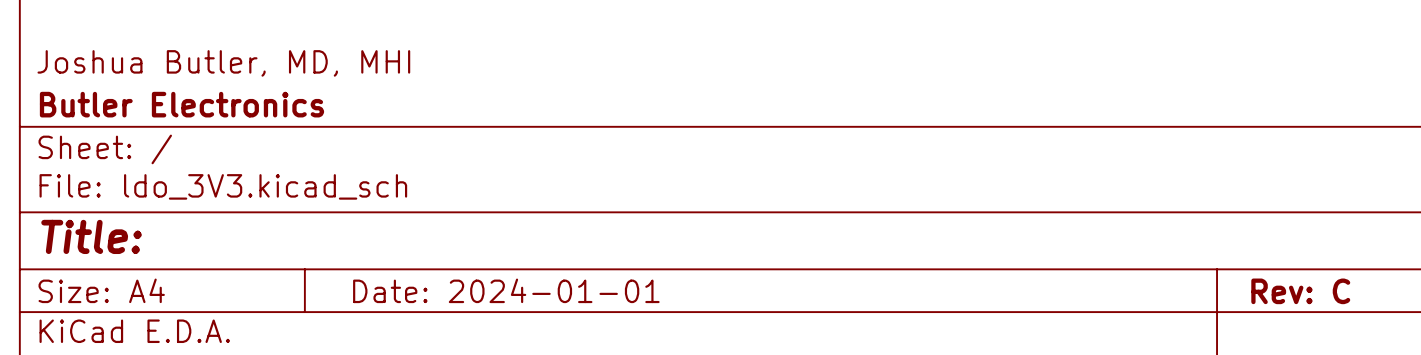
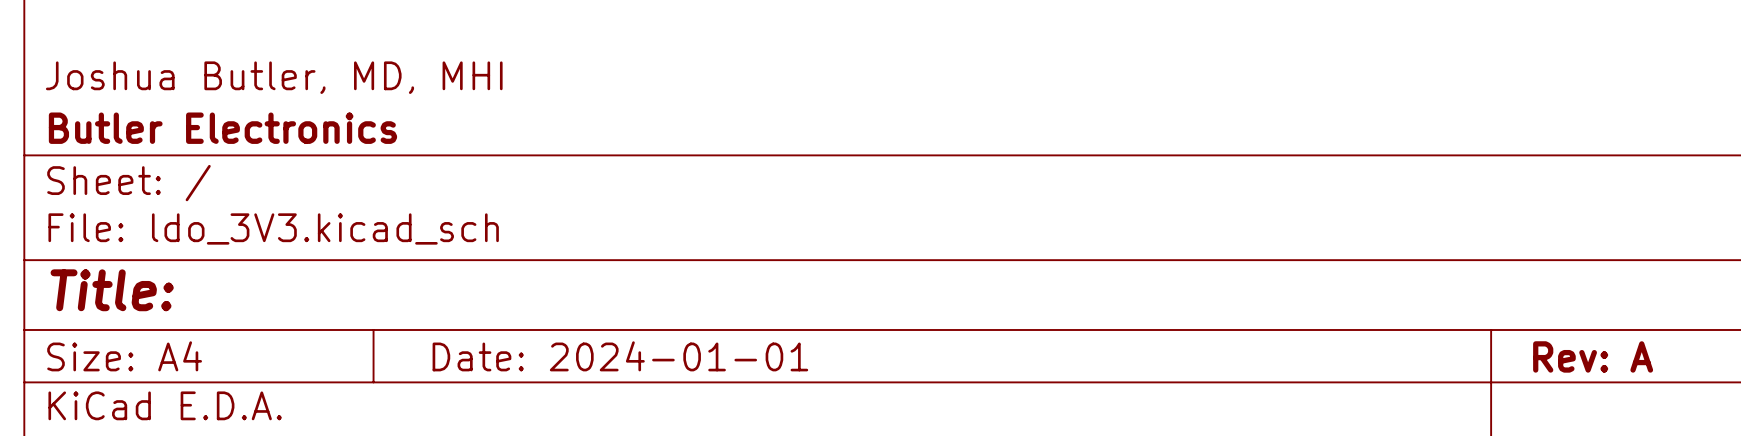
title block: Rev: C (1300, 291) -> Rev: A (1593, 356)

